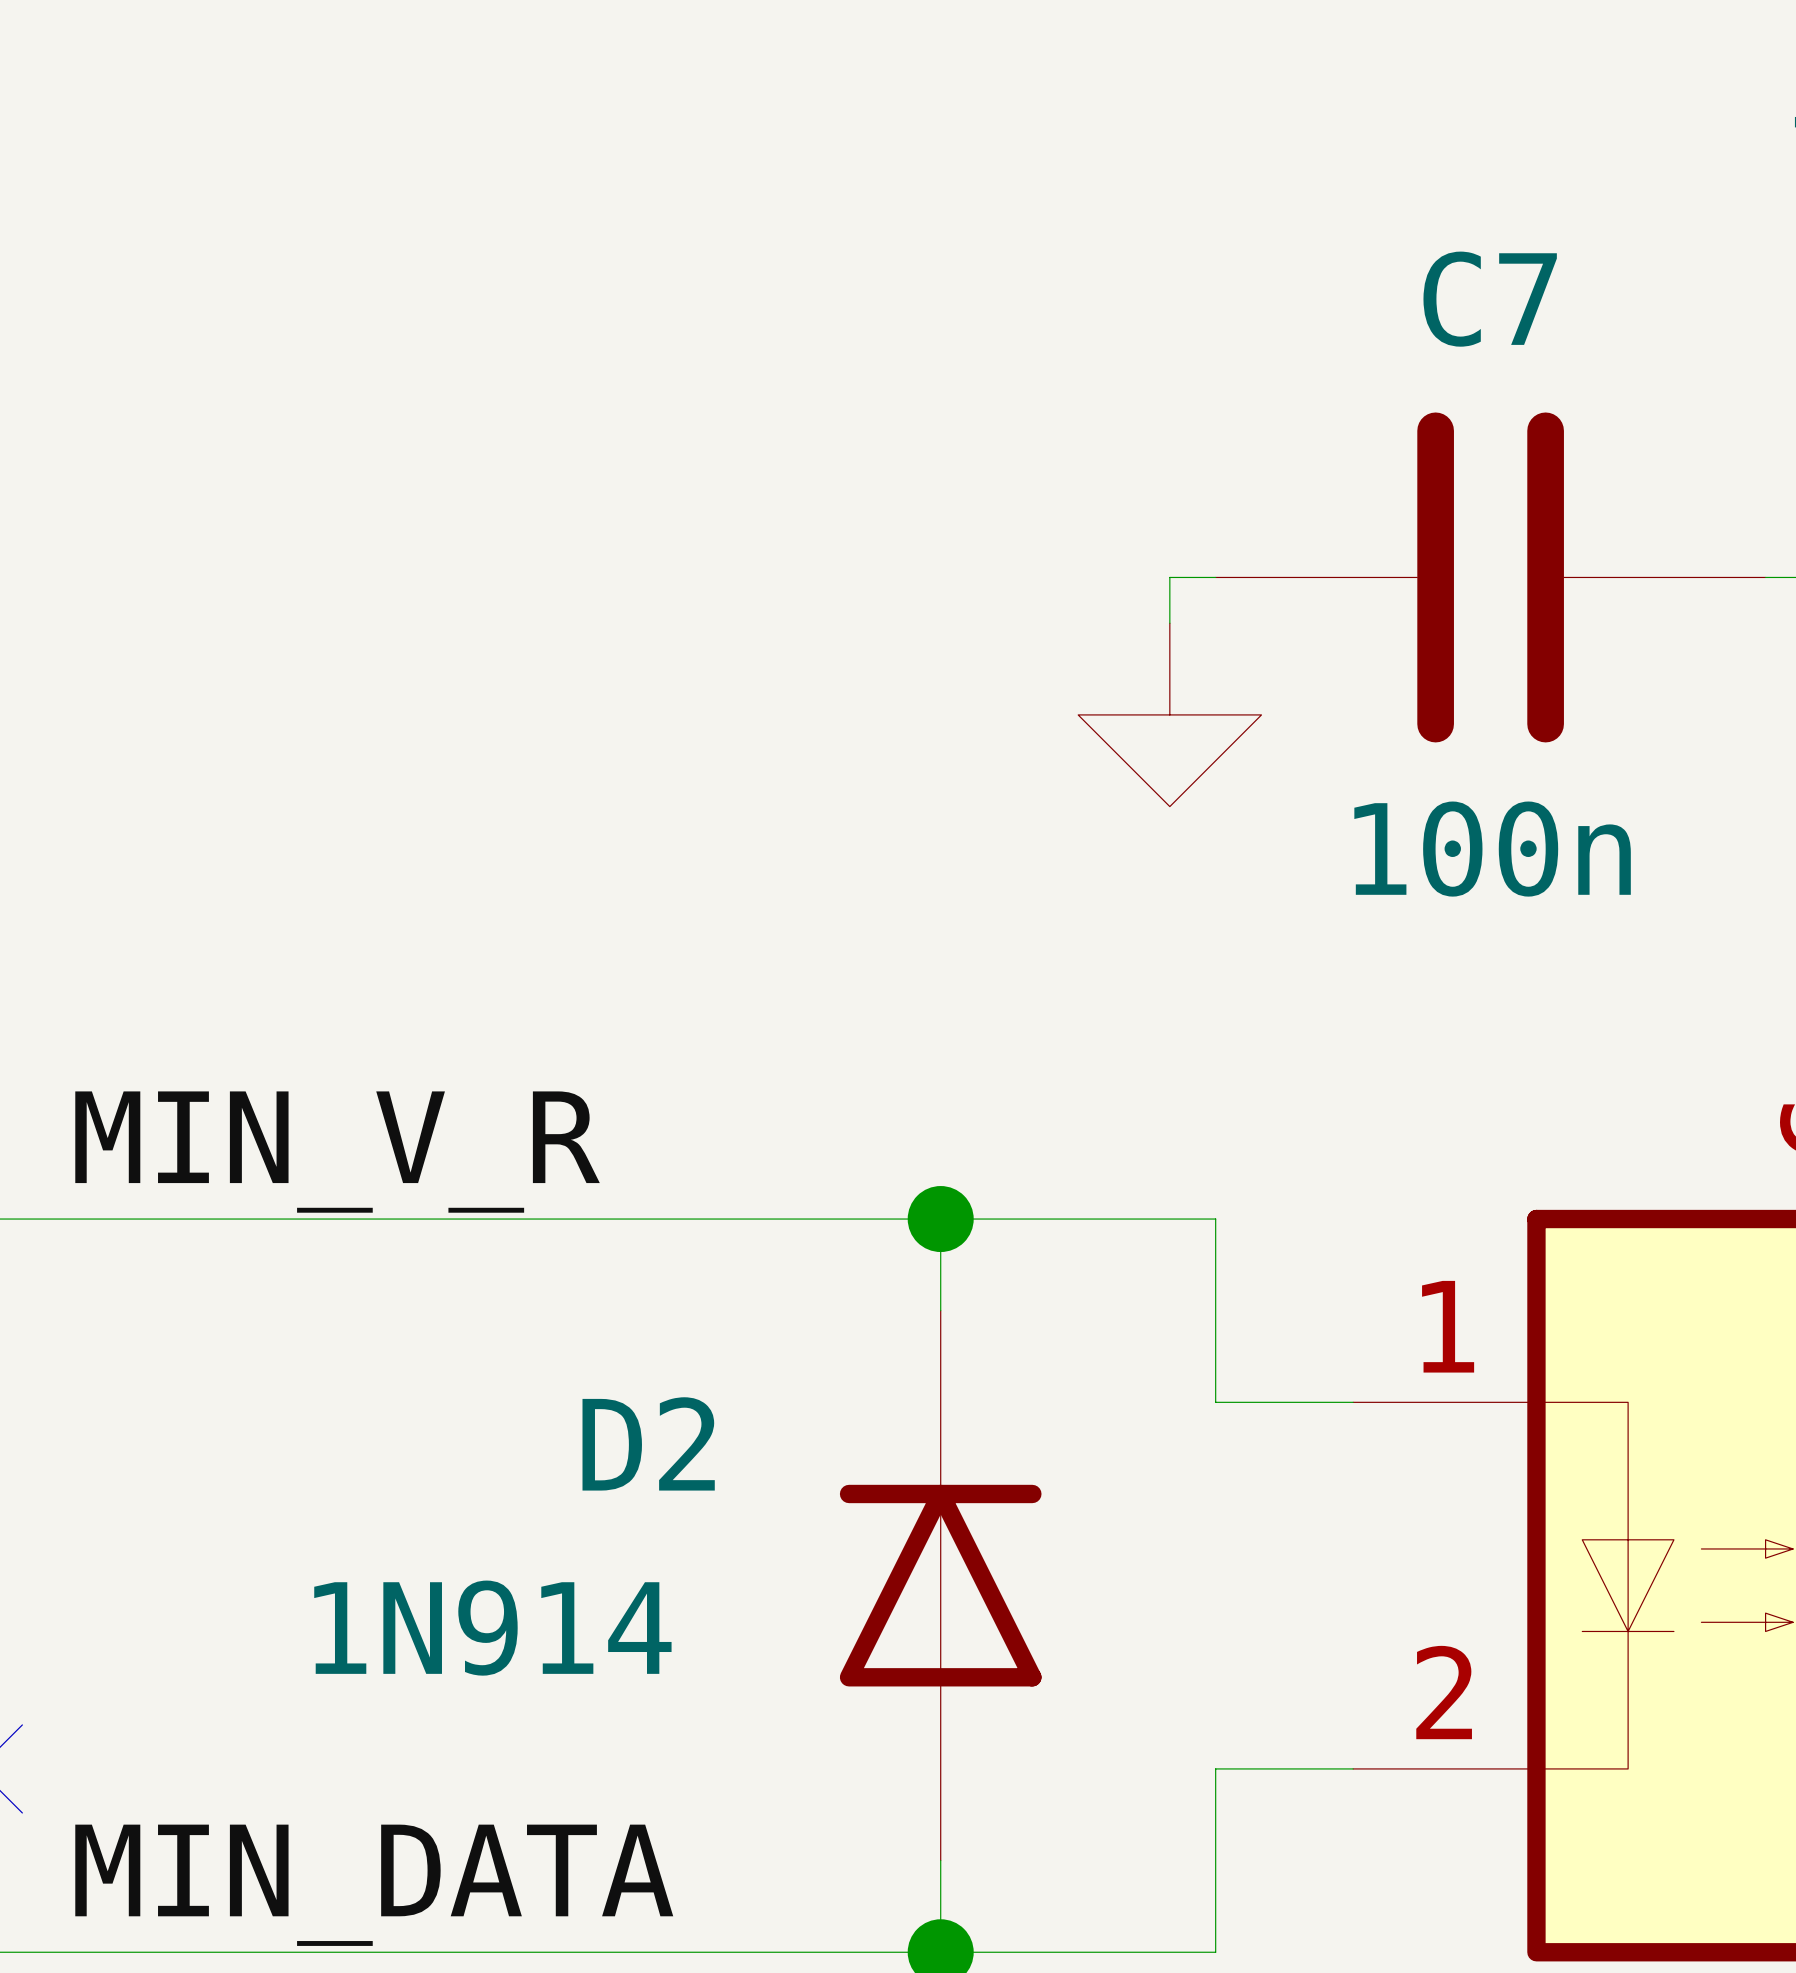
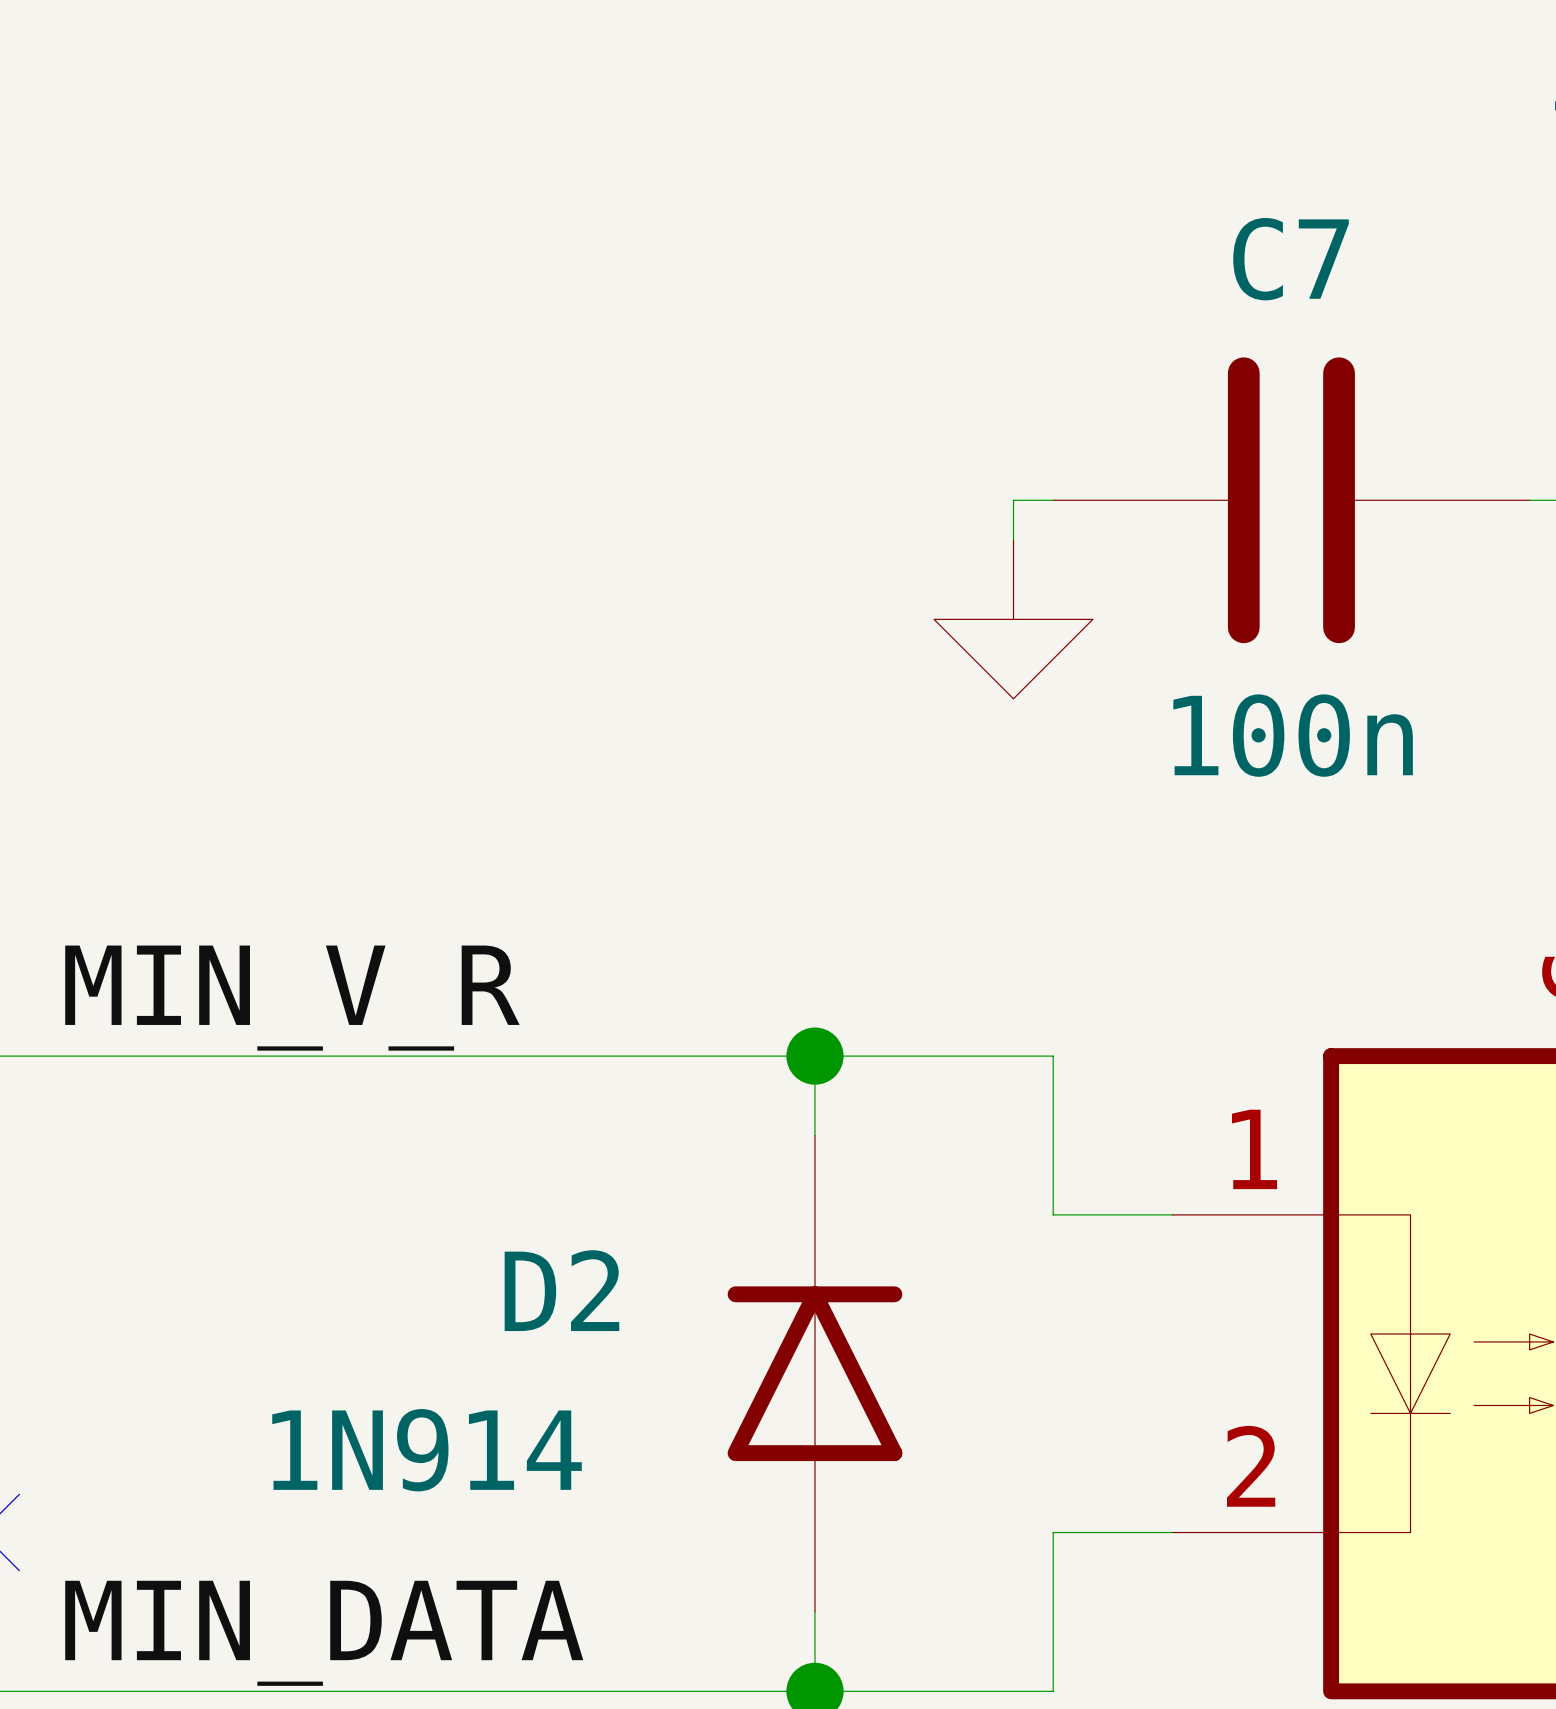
D2 name position: D2 (648, 1443) -> D2 (561, 1290)
D2 value position: 1N914 (492, 1628) -> 1N914 (427, 1450)

